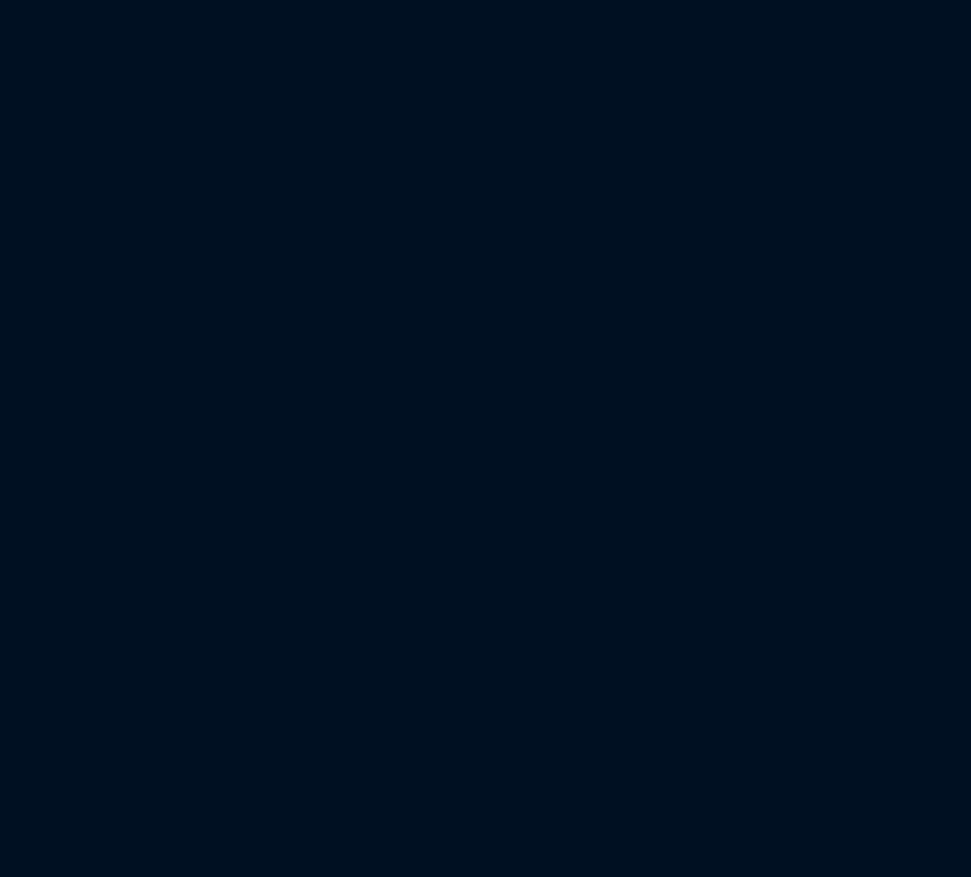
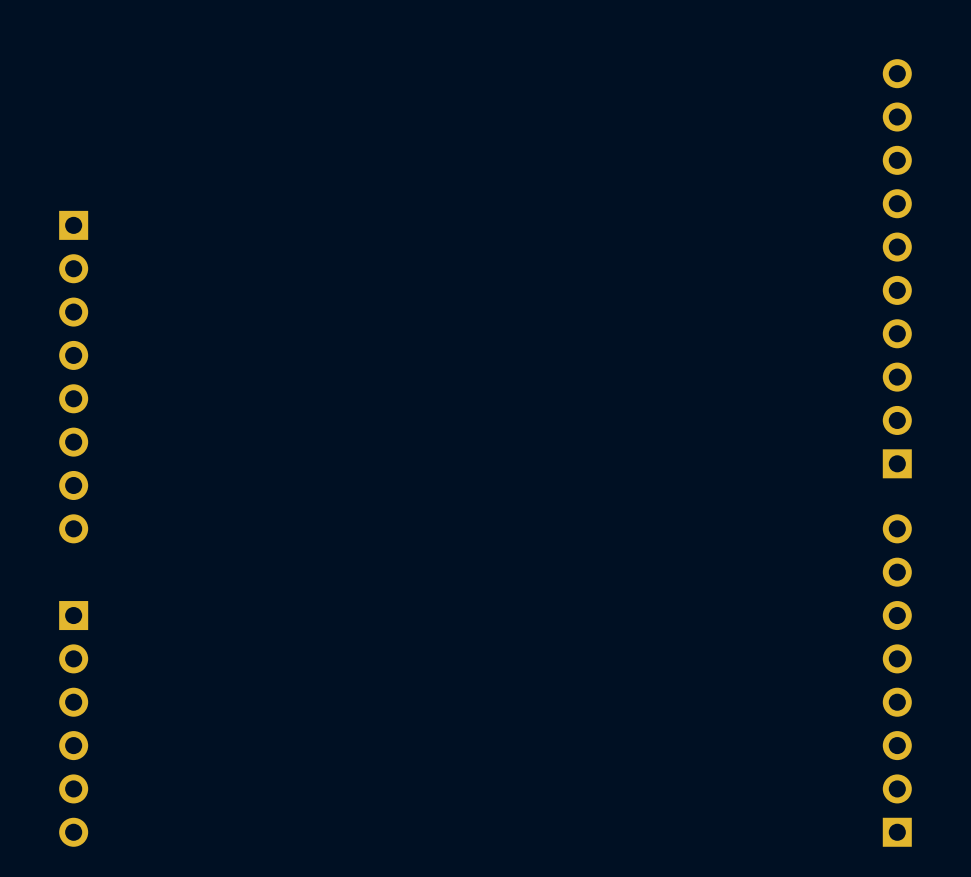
part: none -> (897, 268)
part: none -> (73, 377)
part: none -> (897, 680)
part: none -> (73, 723)

